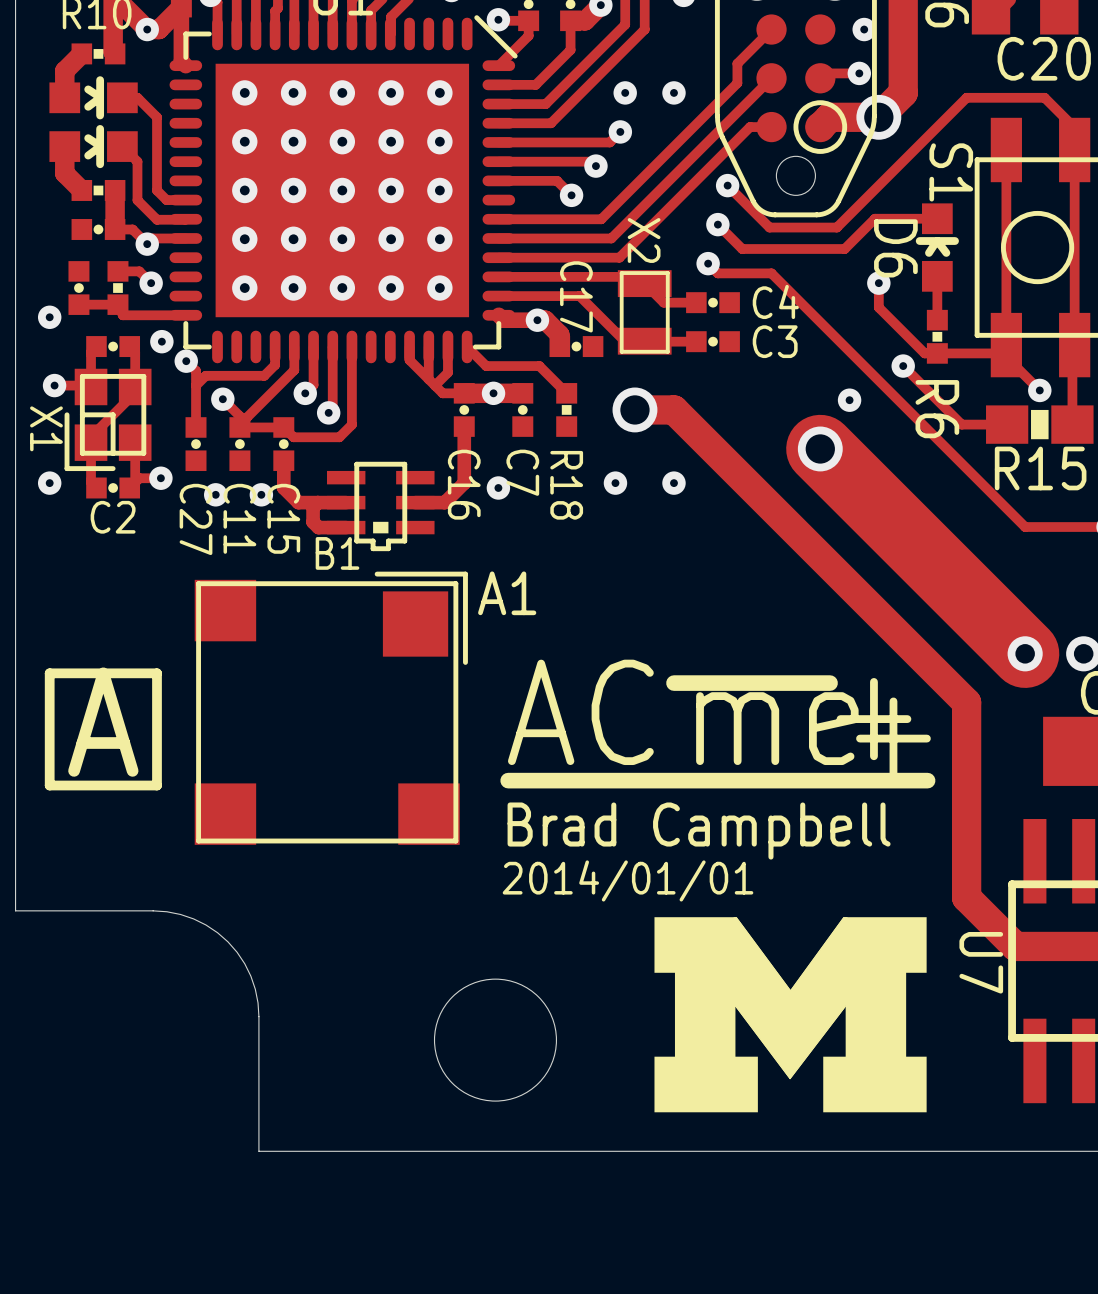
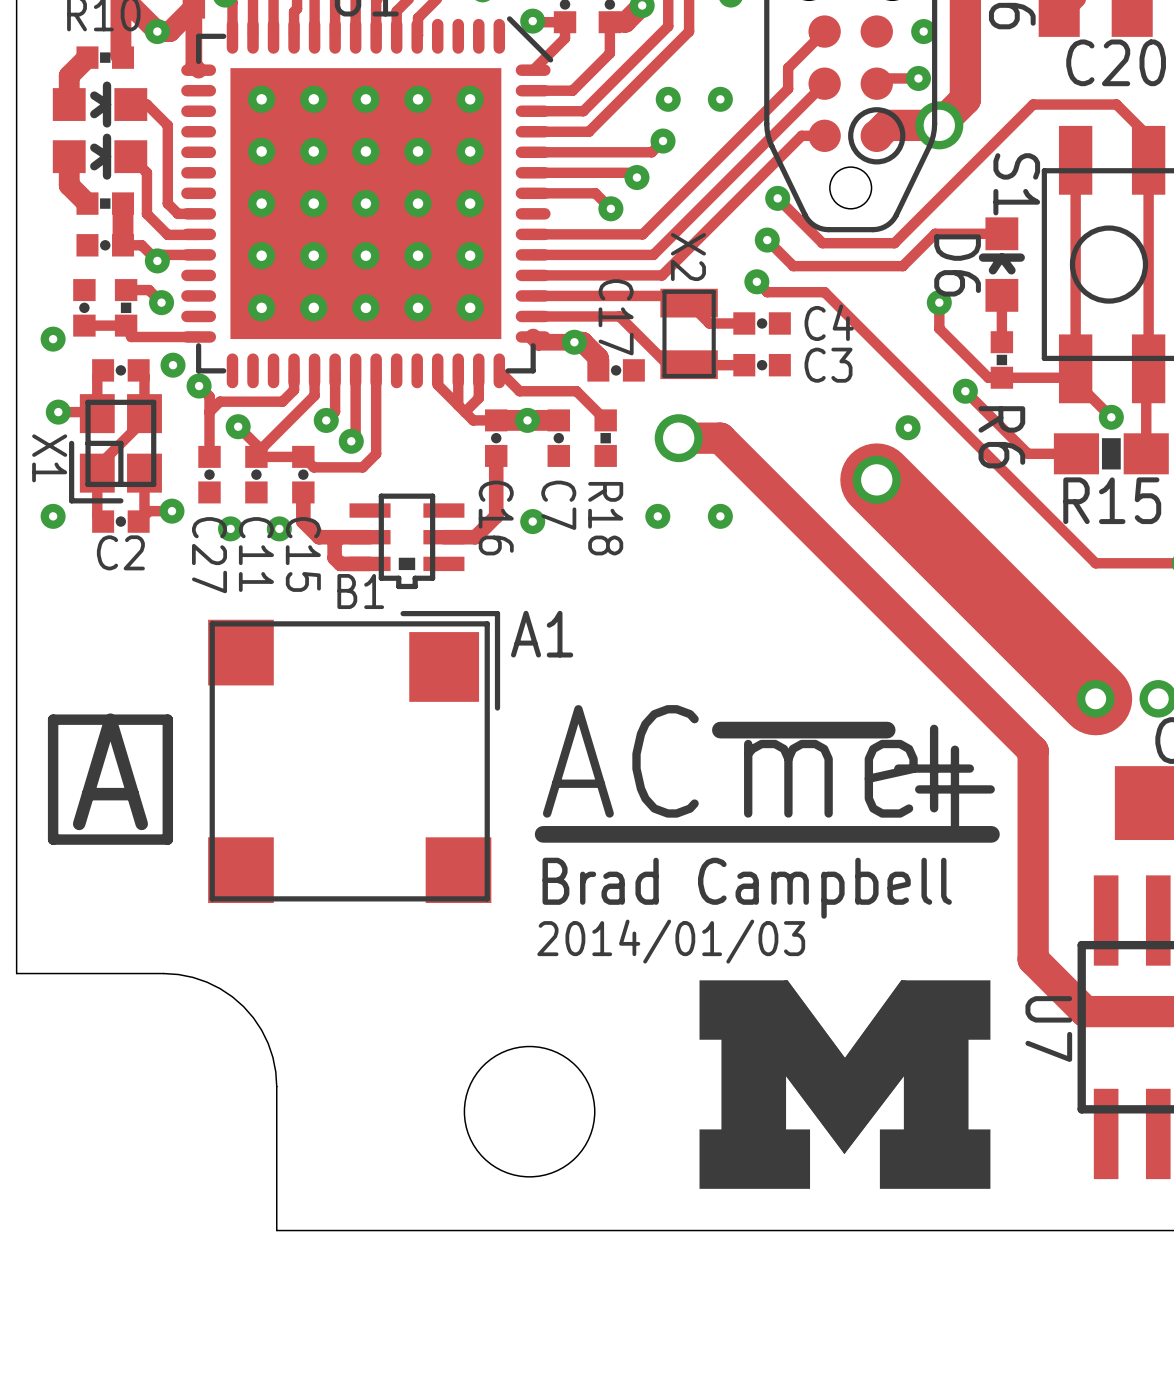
text: 2014/01/01 (628, 880) -> 2014/01/03 (671, 941)

